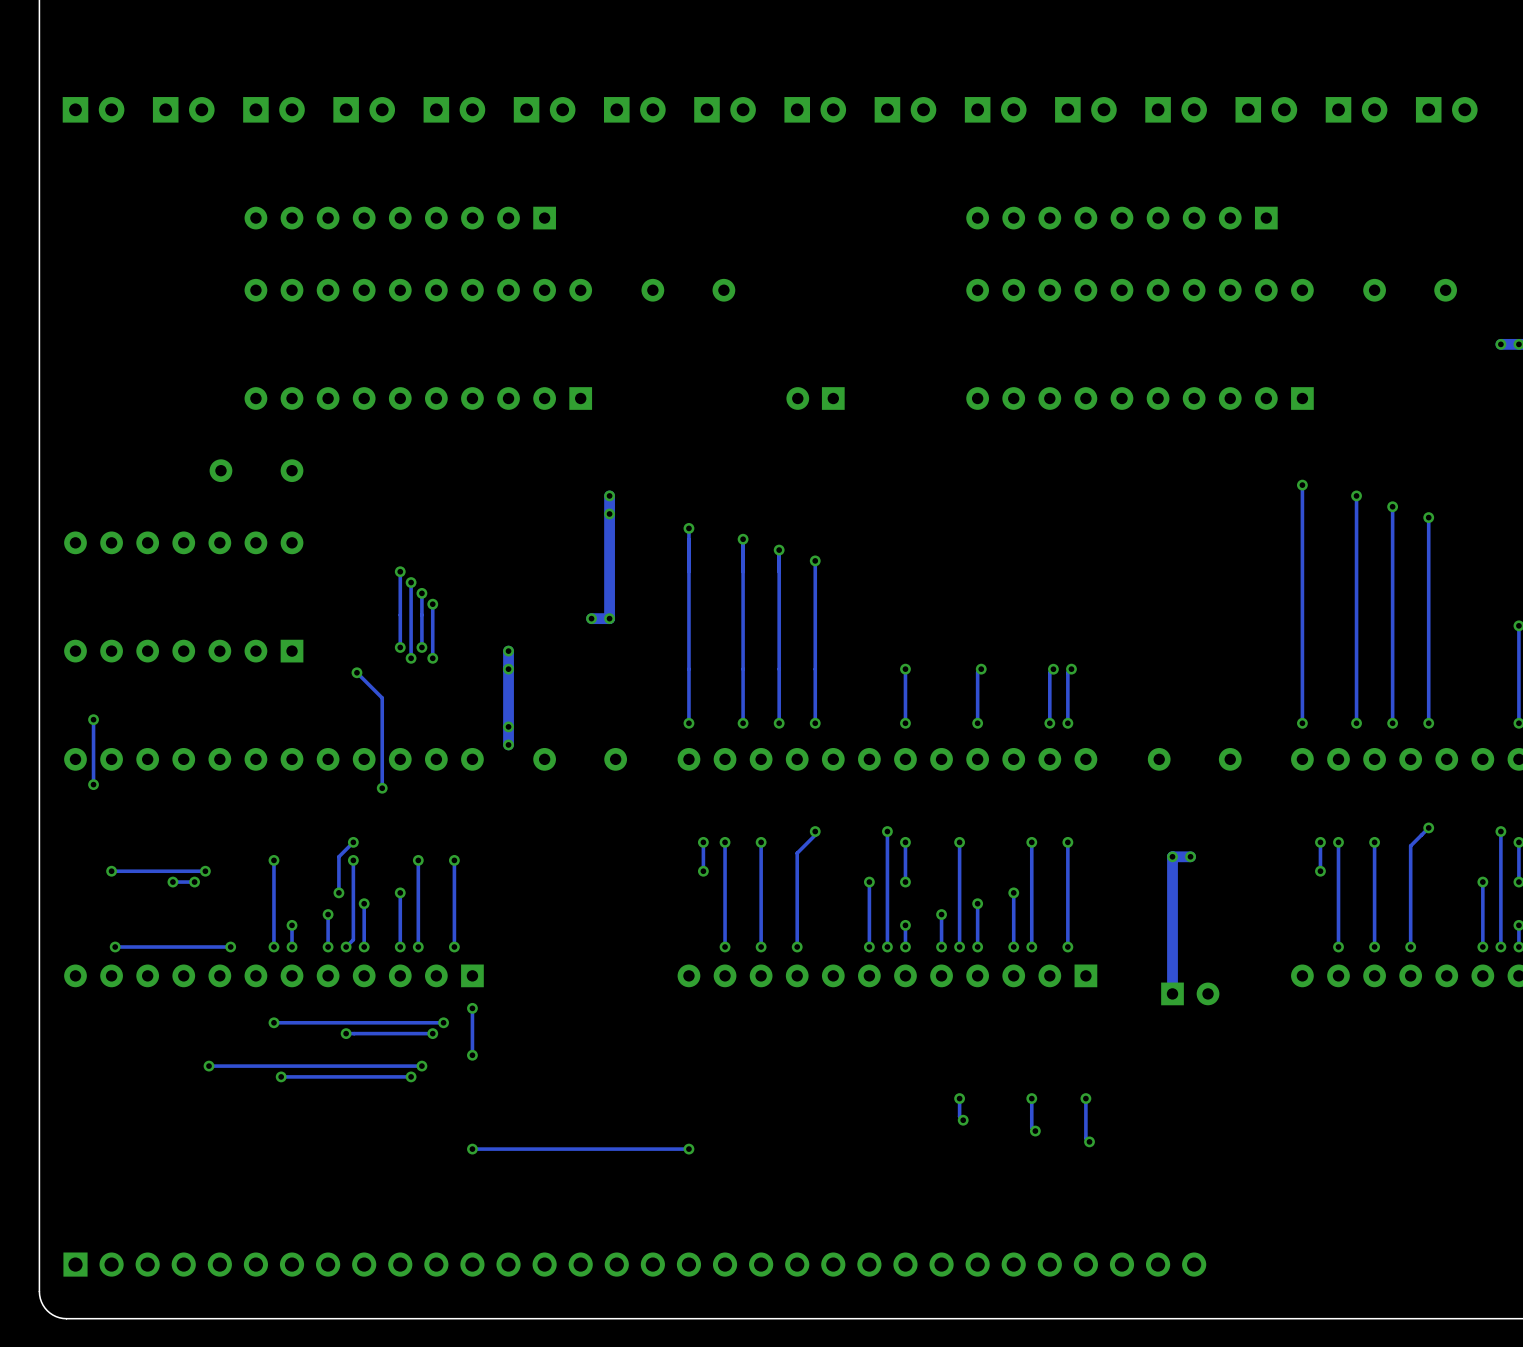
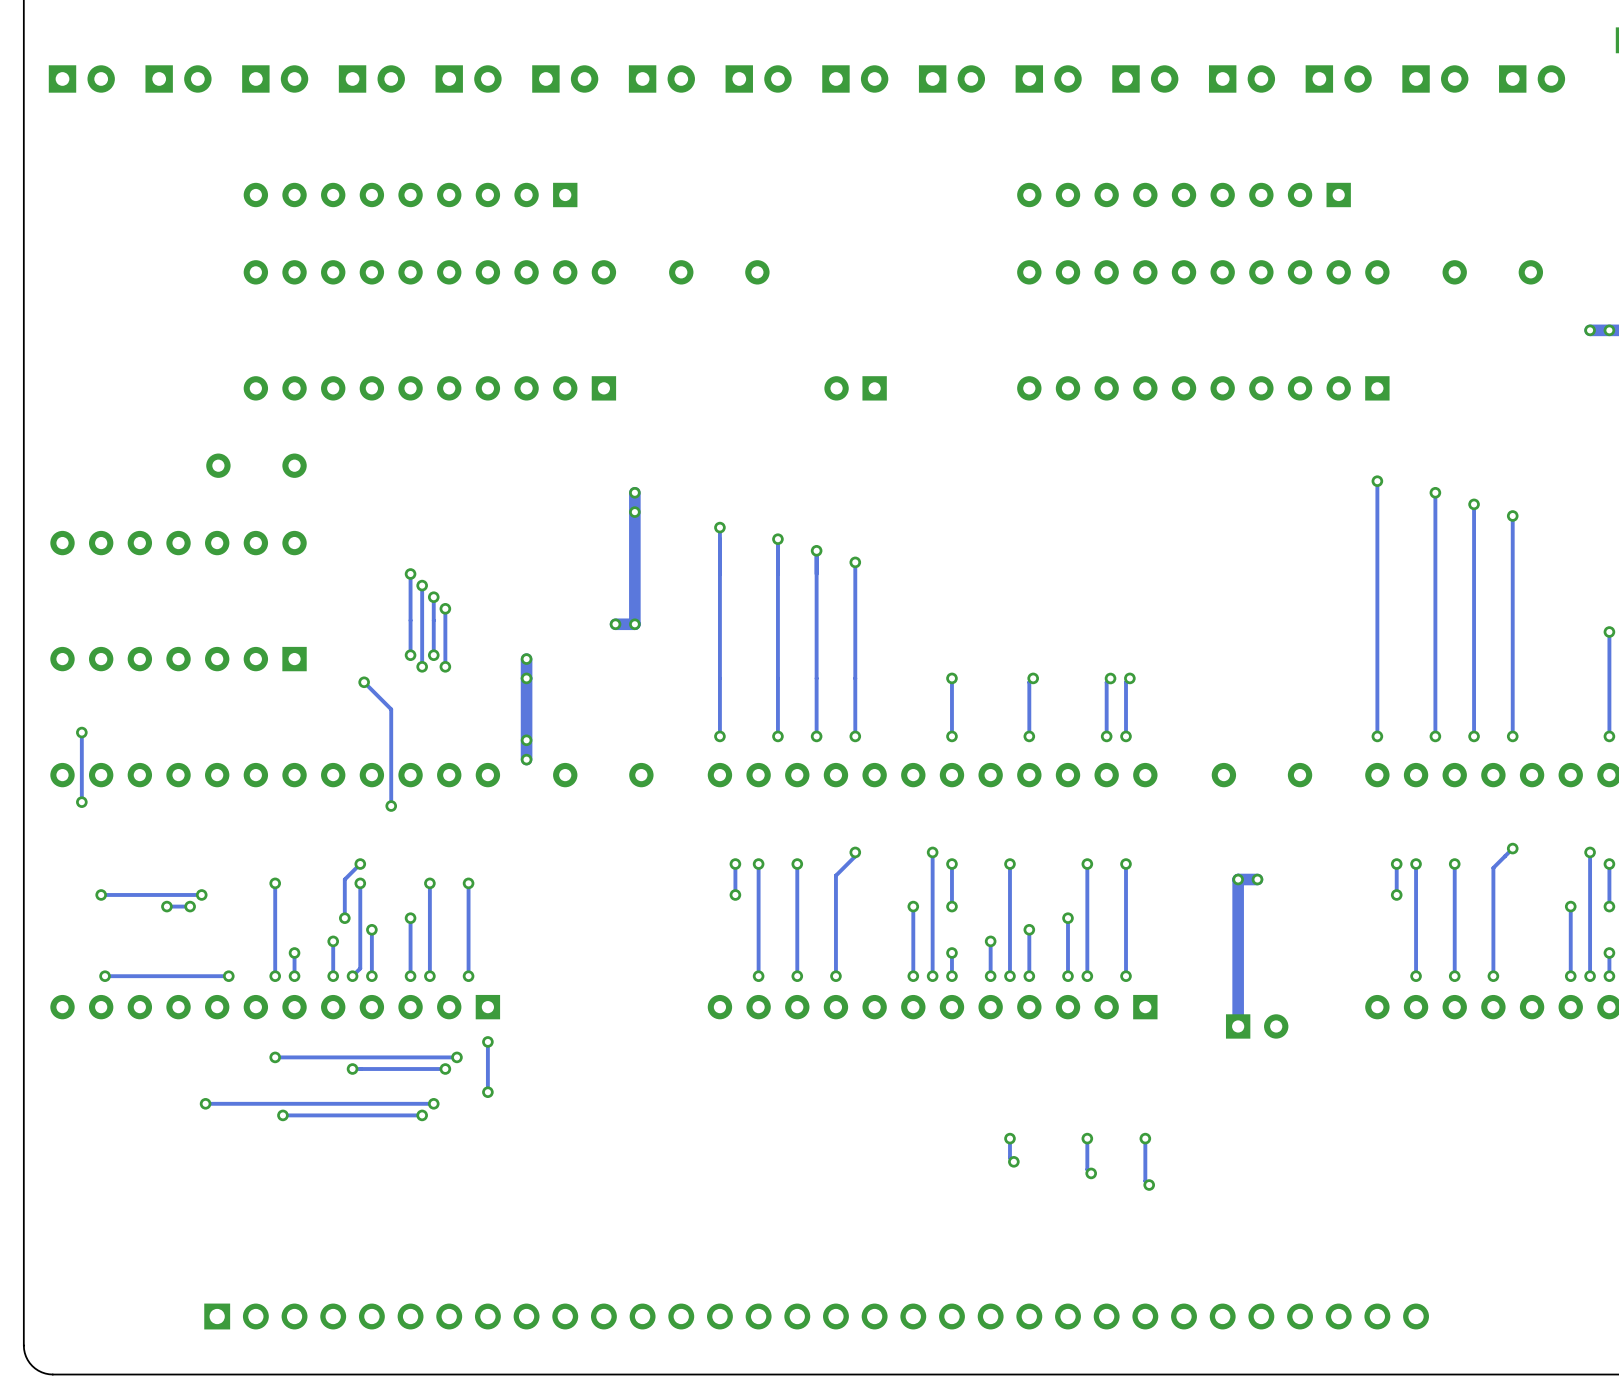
via: (472, 1149) -> none
track: (688, 1149) (472, 1149) -> none
via: (688, 1149) -> none
part position: (634, 1264) -> (816, 1316)

